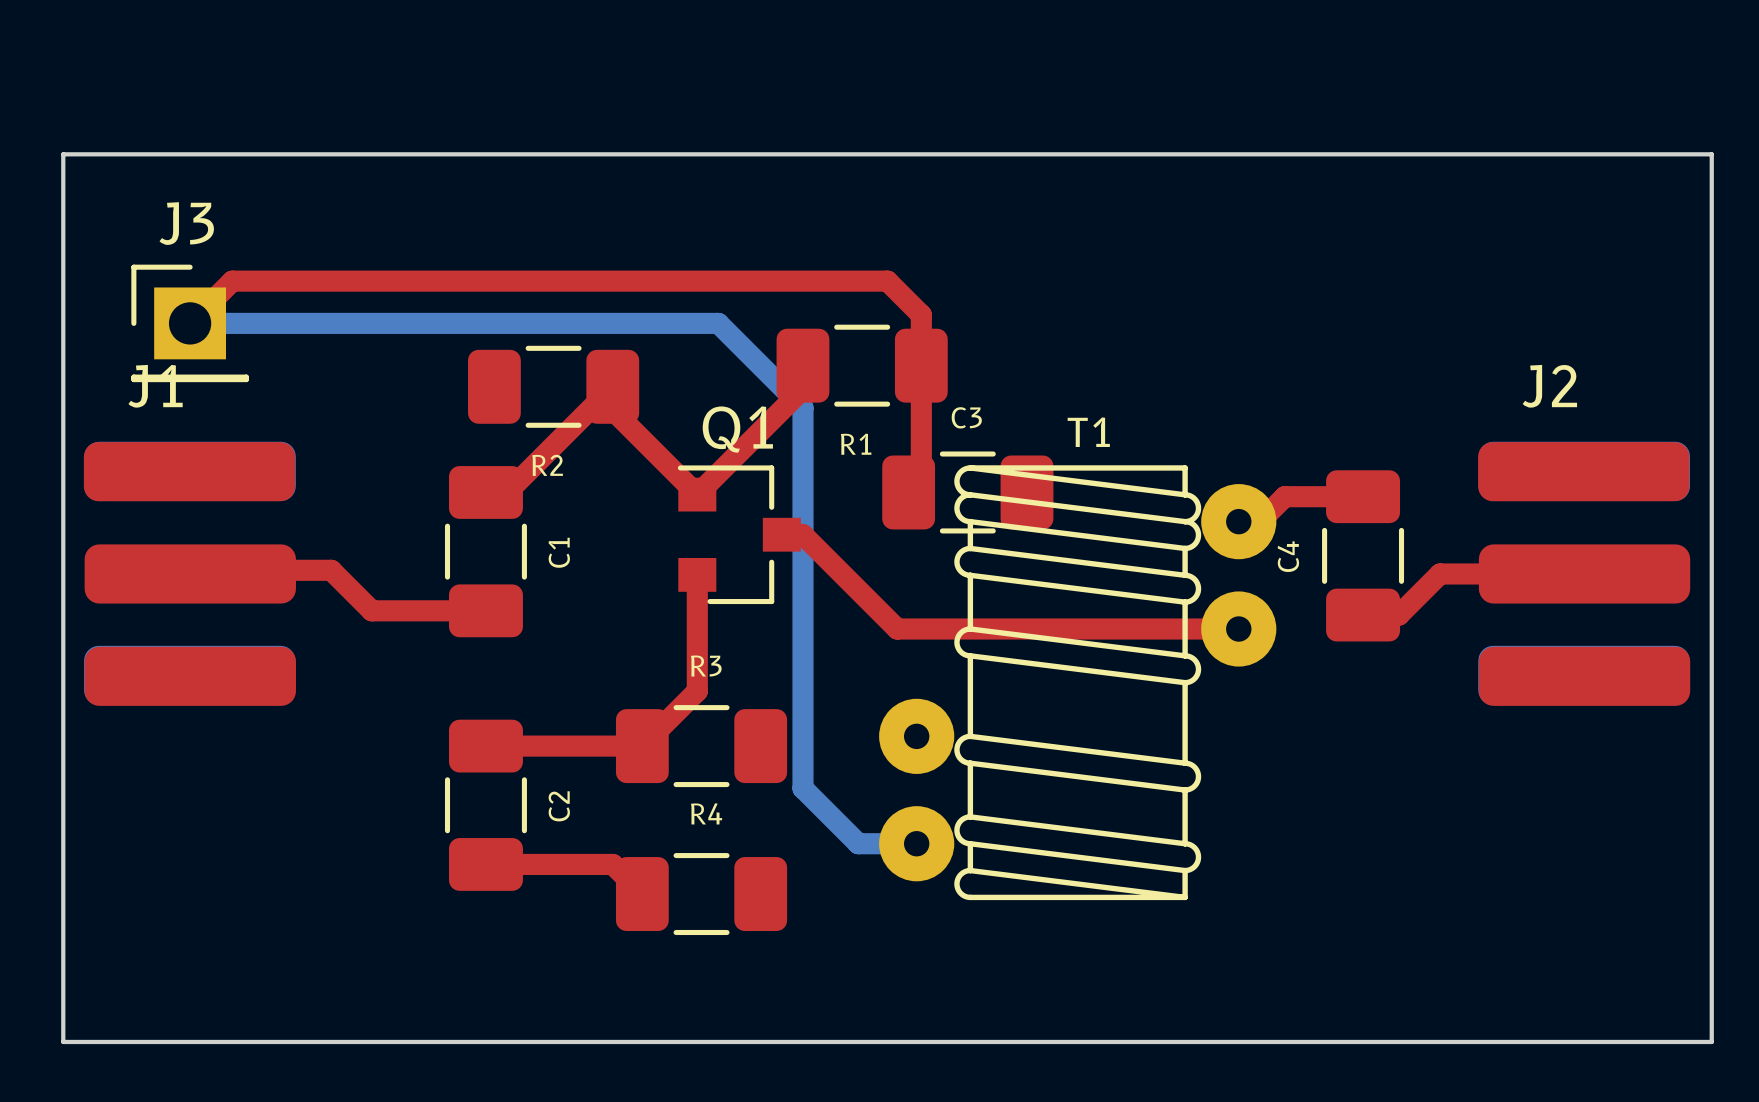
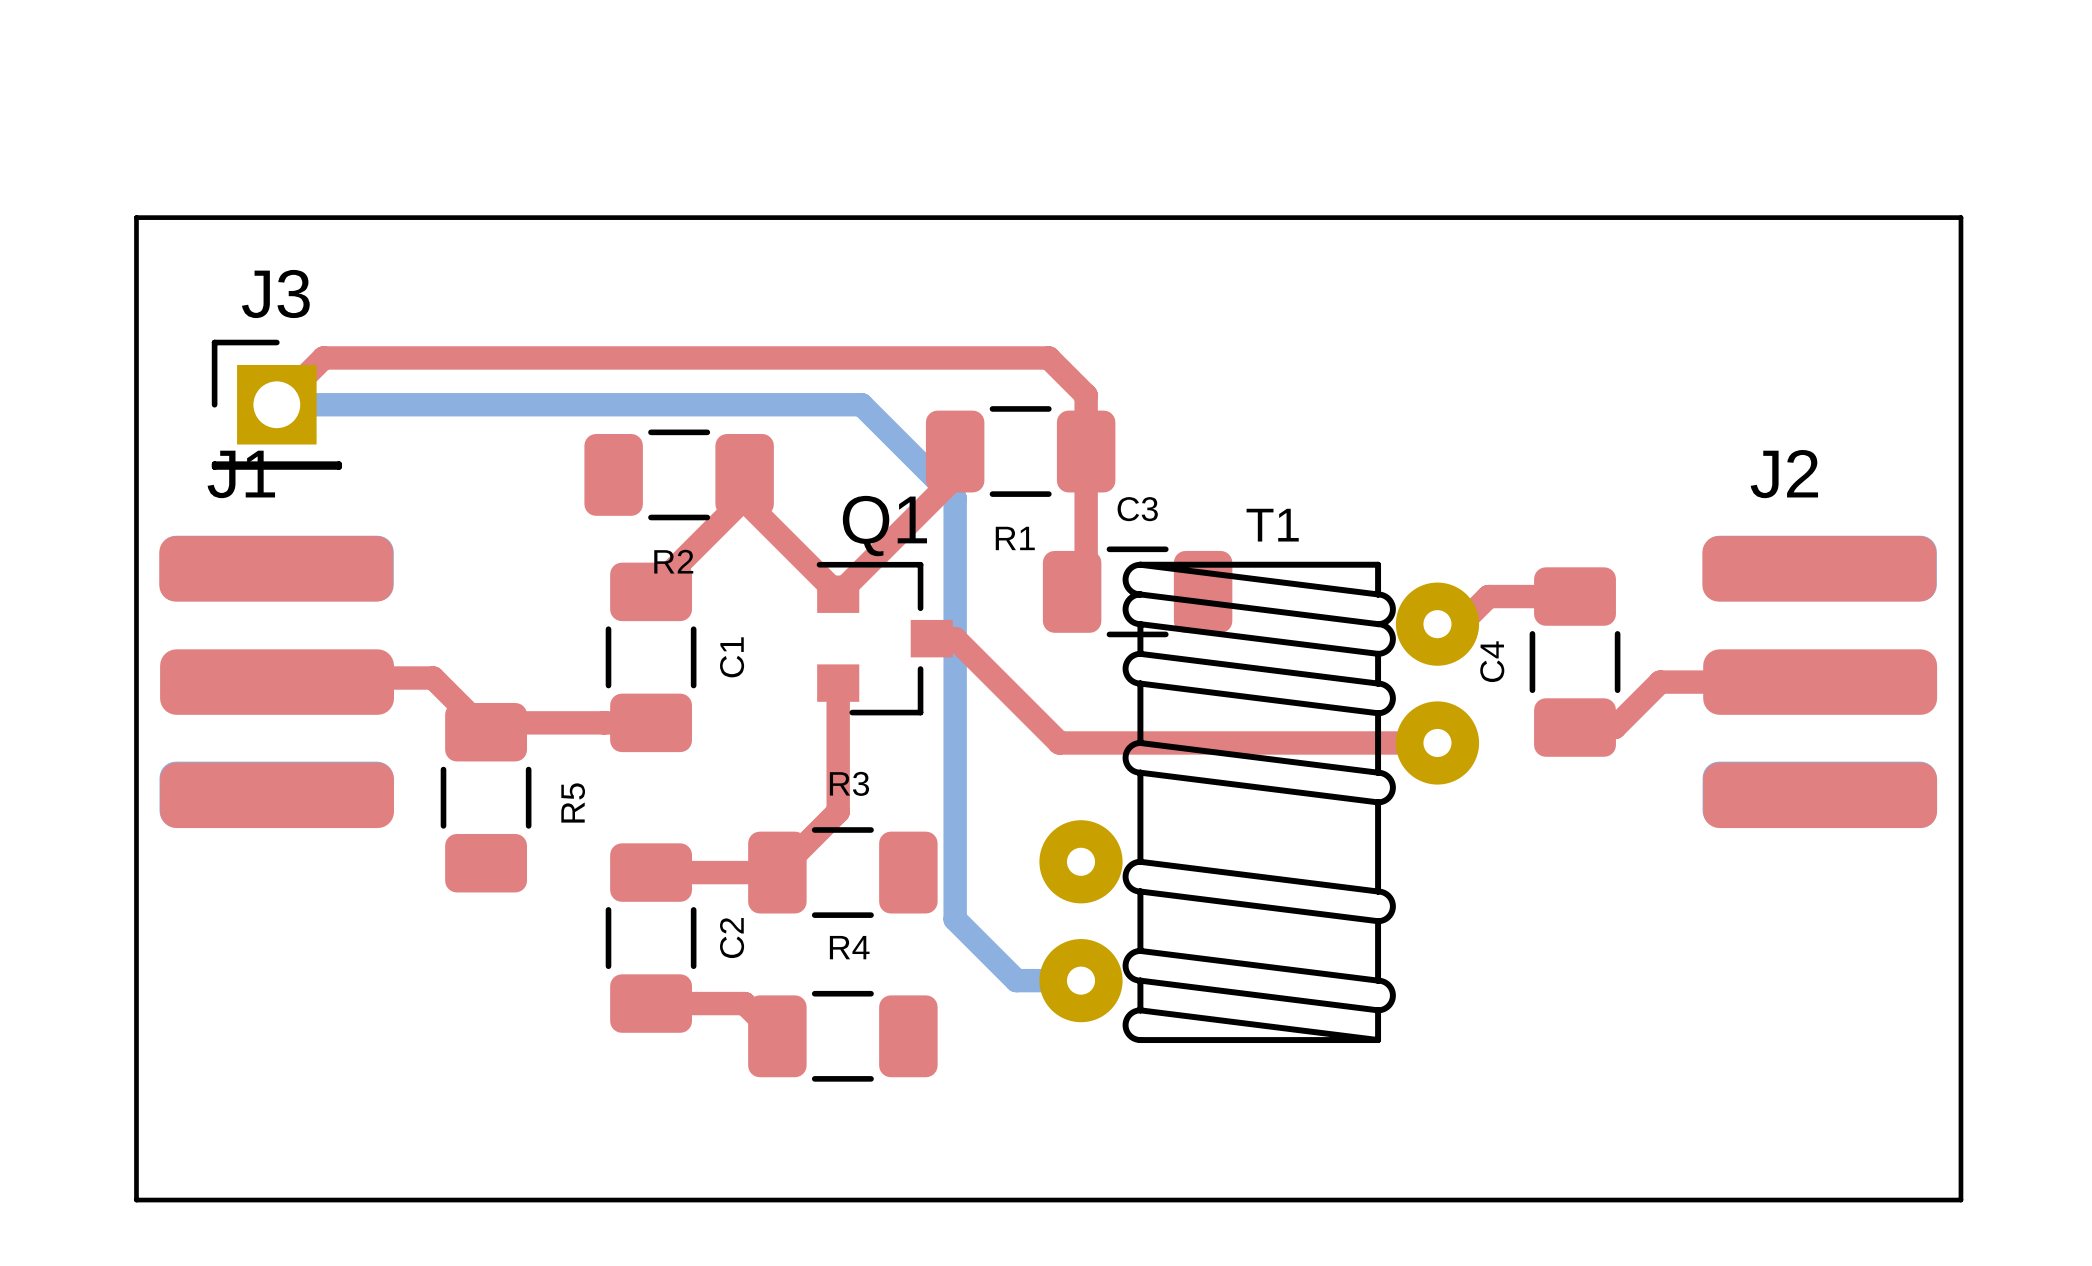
top track: (612, 386) (507, 492) (485, 492) -> none
top track: none -> (744, 498) (651, 591)
C1 position: (485, 551) -> (651, 657)
R5: none -> (486, 797)
C2 position: (485, 805) -> (651, 938)

